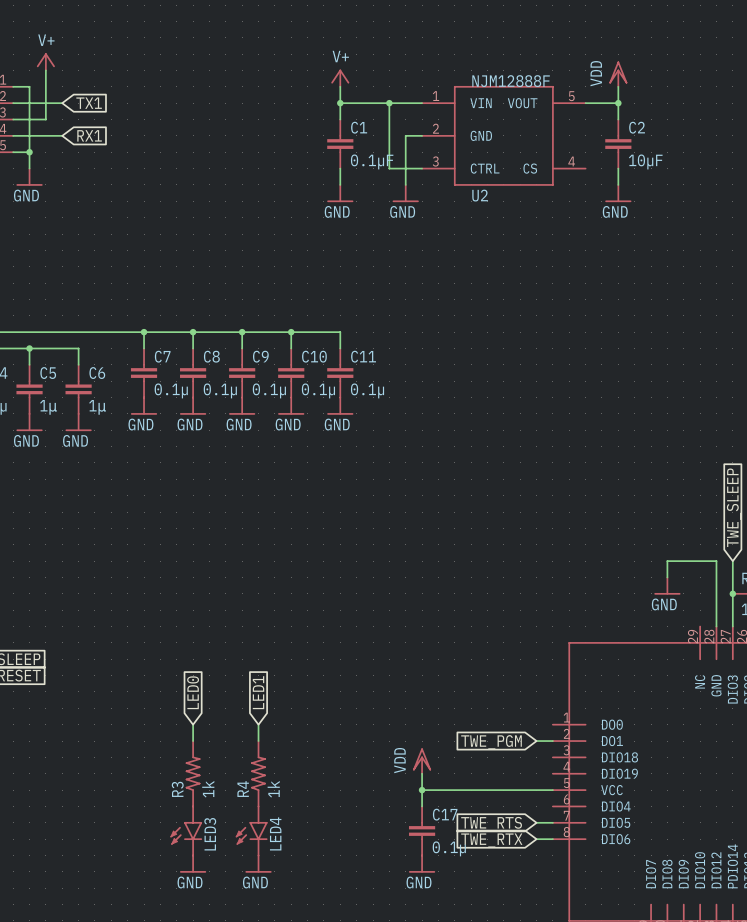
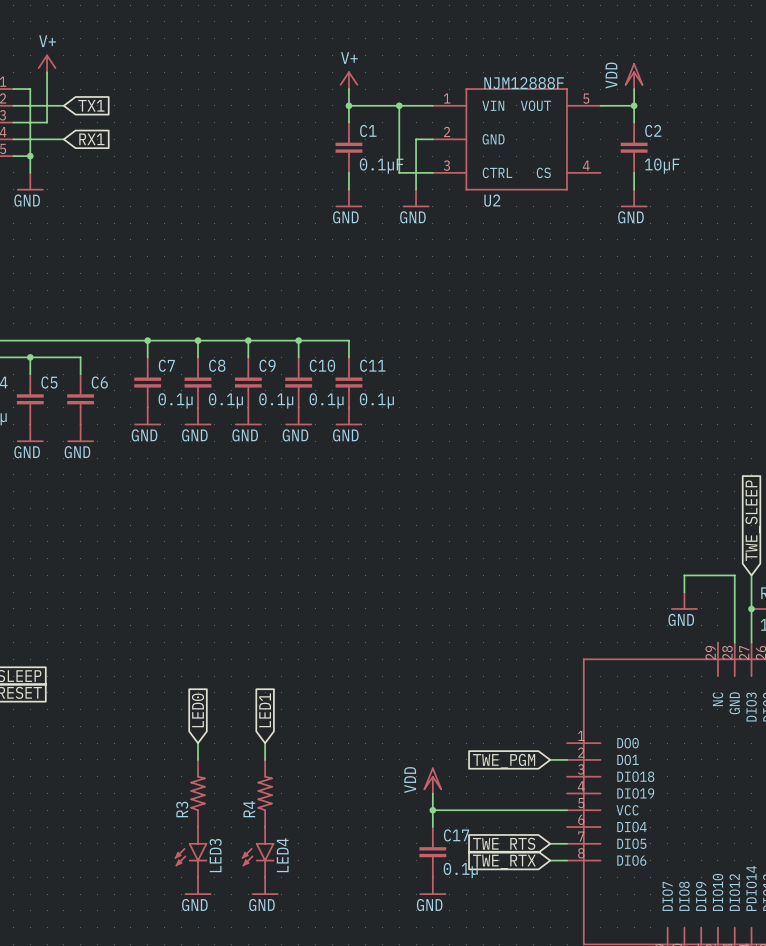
C5 value: 1μ (48, 407) -> none
C6 value: 1μ (97, 407) -> none
R3 value: 1k (208, 789) -> none
R4 value: 1k (273, 789) -> none

